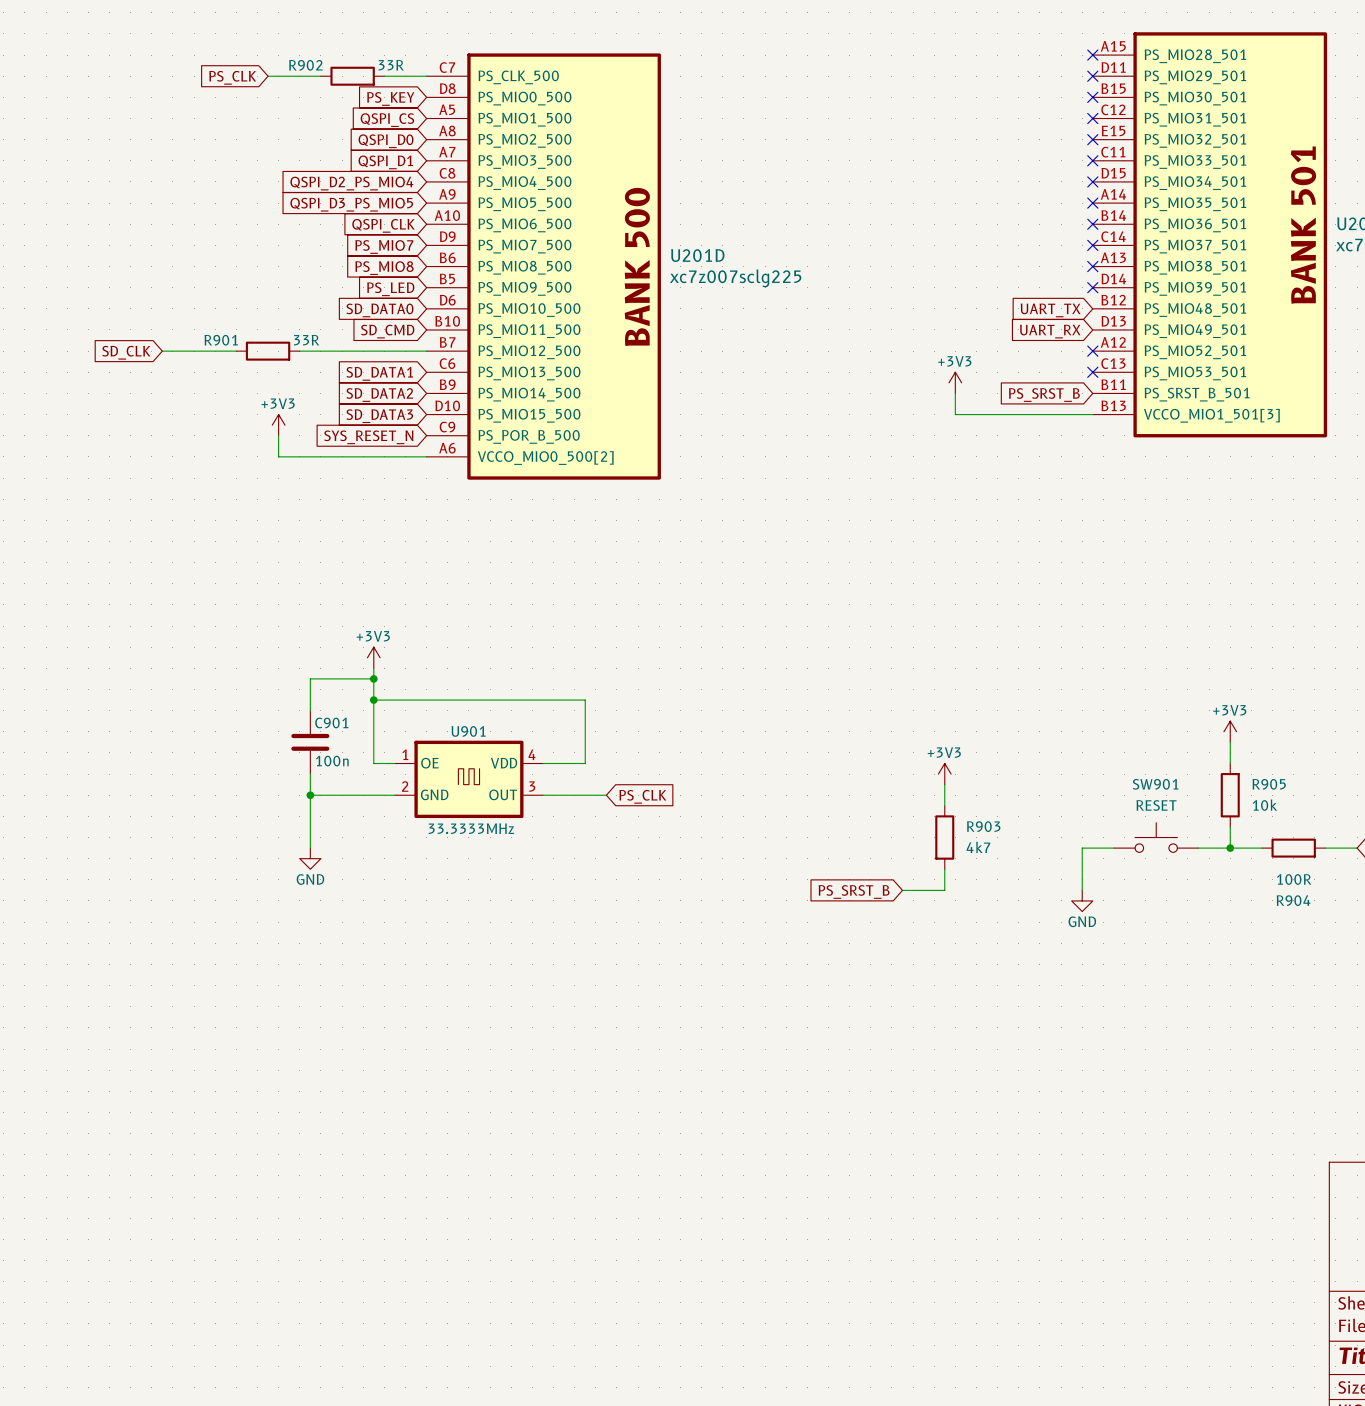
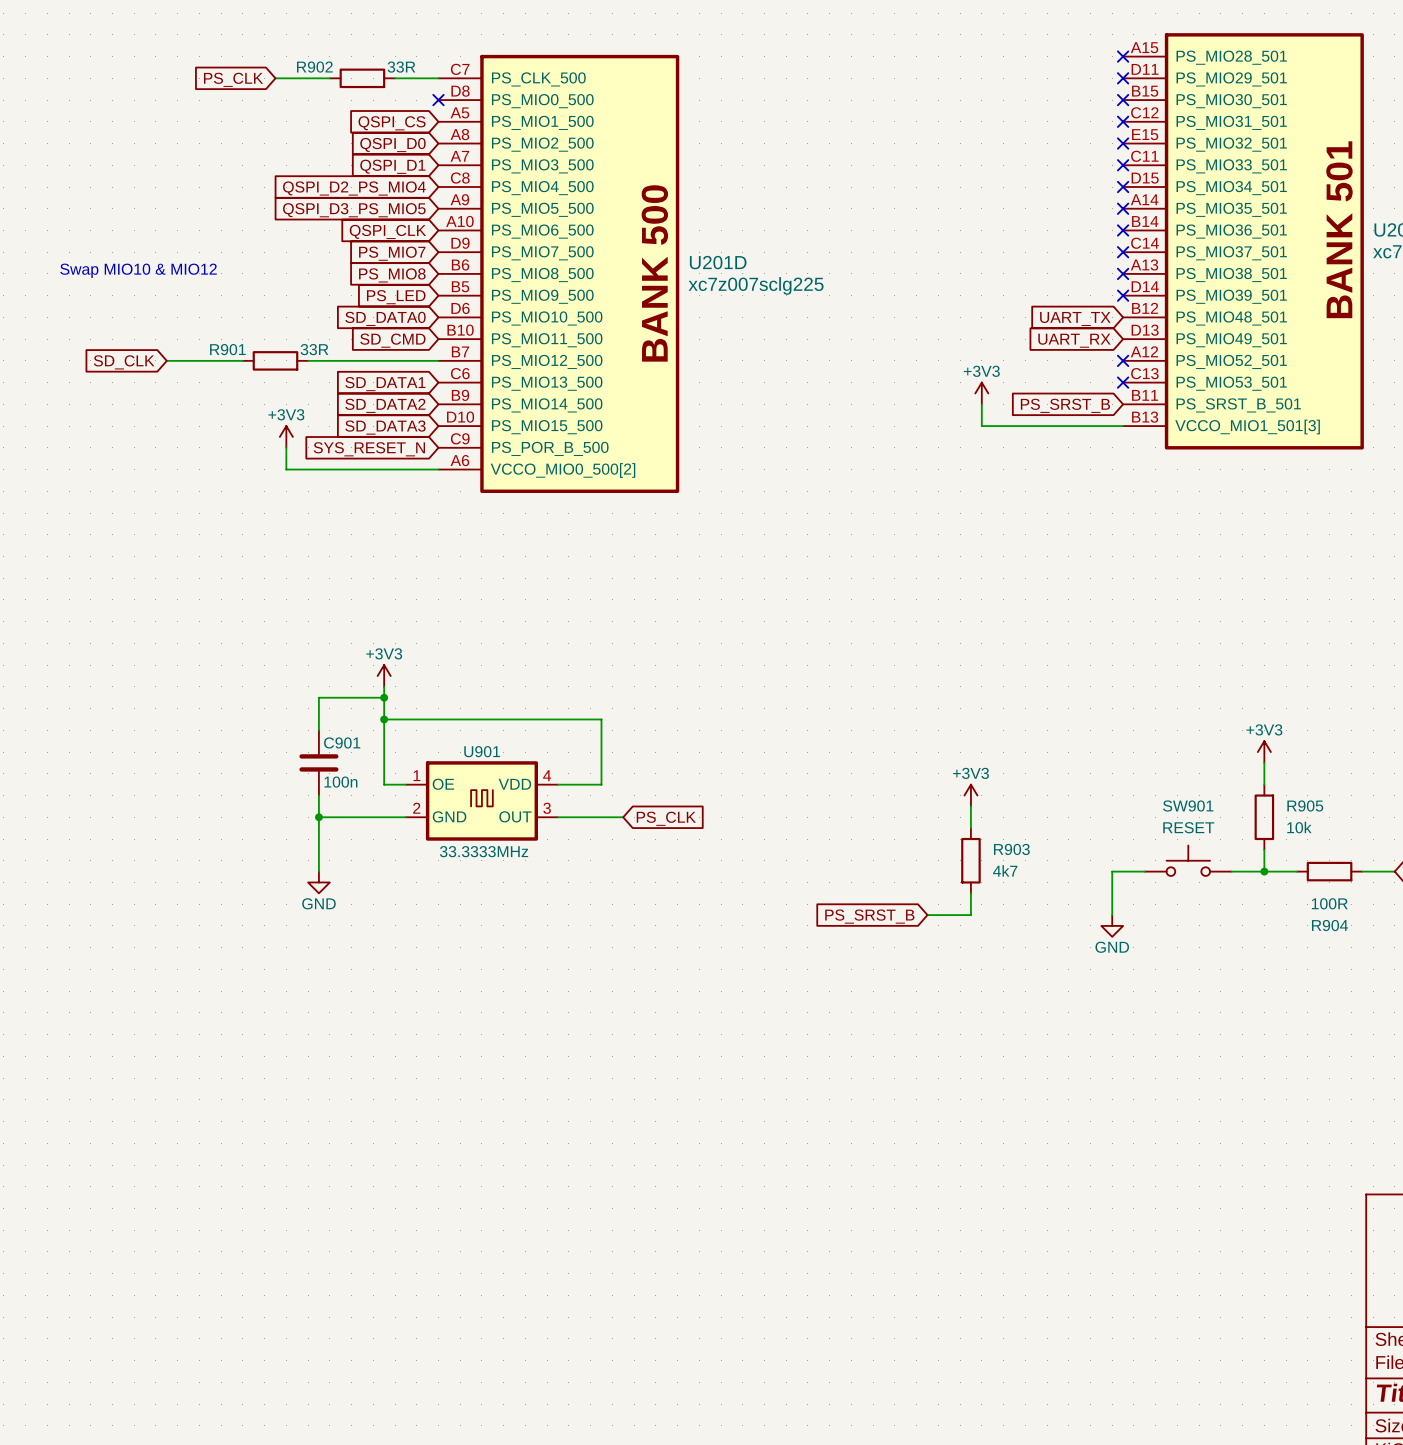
no-connect mark: none -> (438, 100)
global label: PS_KEY (390, 98) -> none
text: none -> Swap MIO10 & MIO12 (138, 270)

